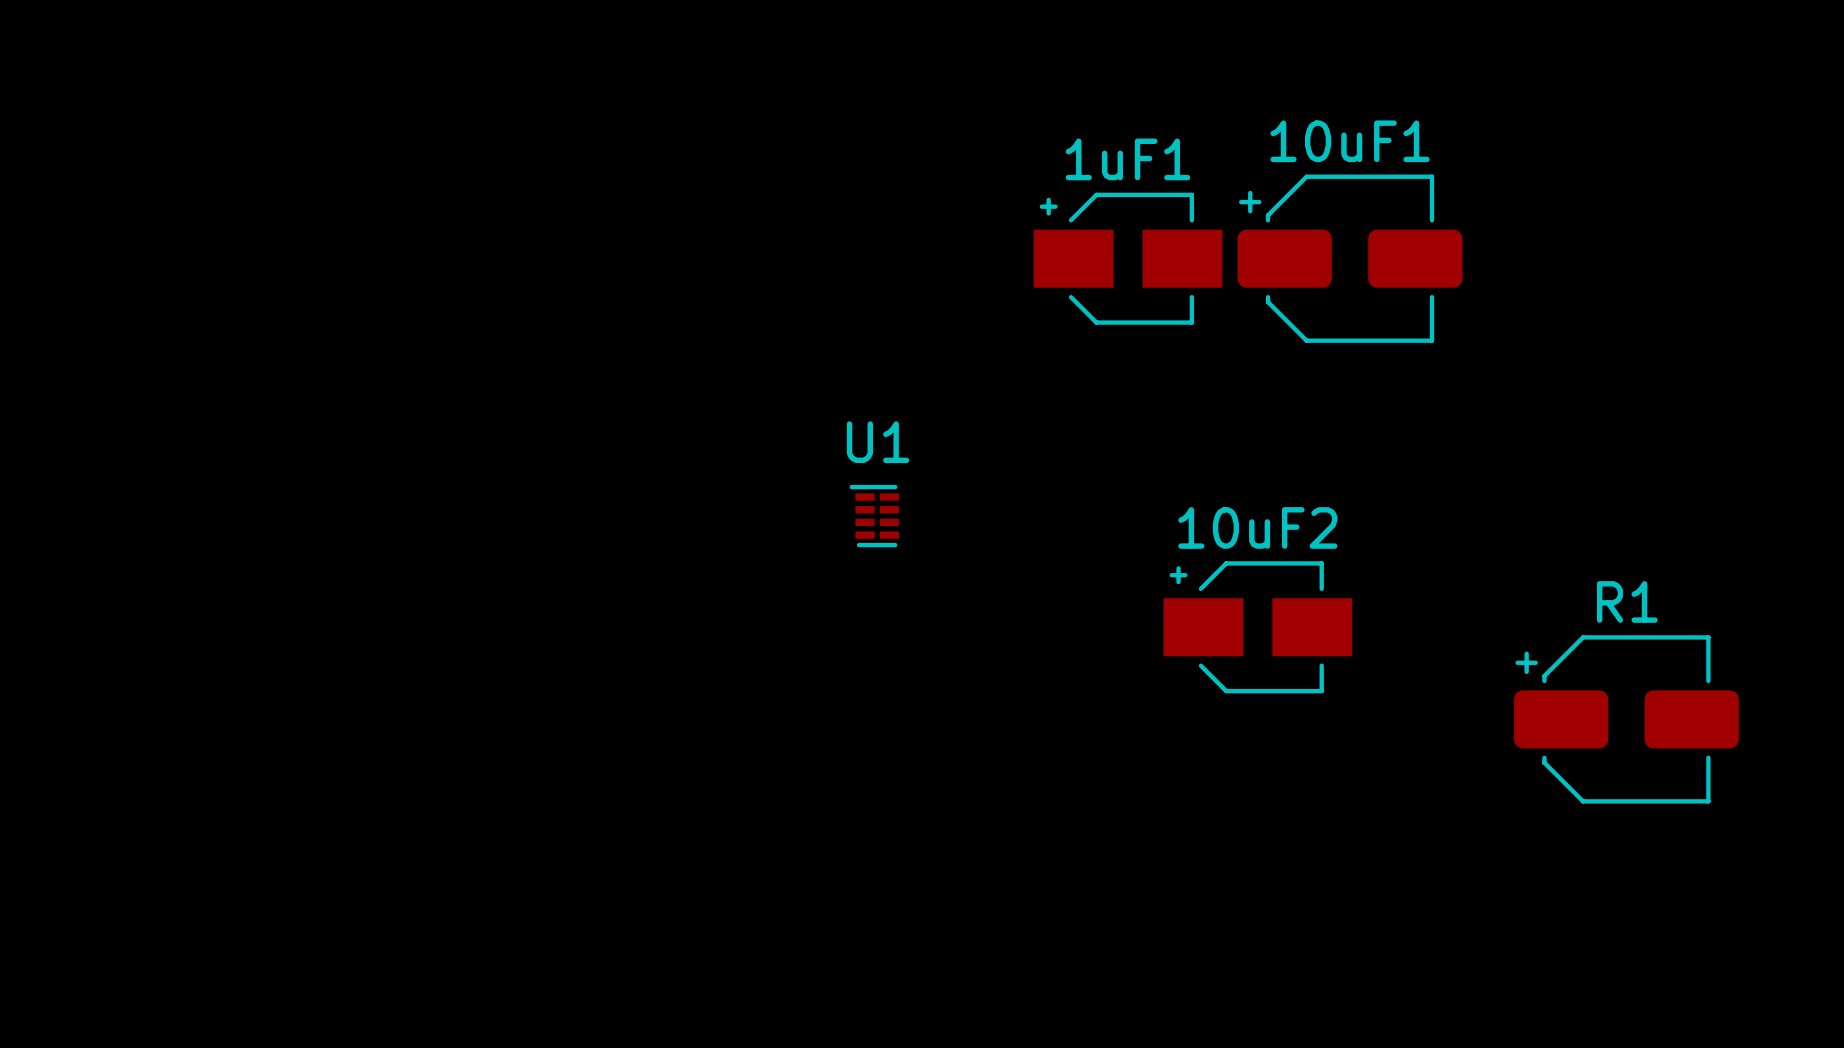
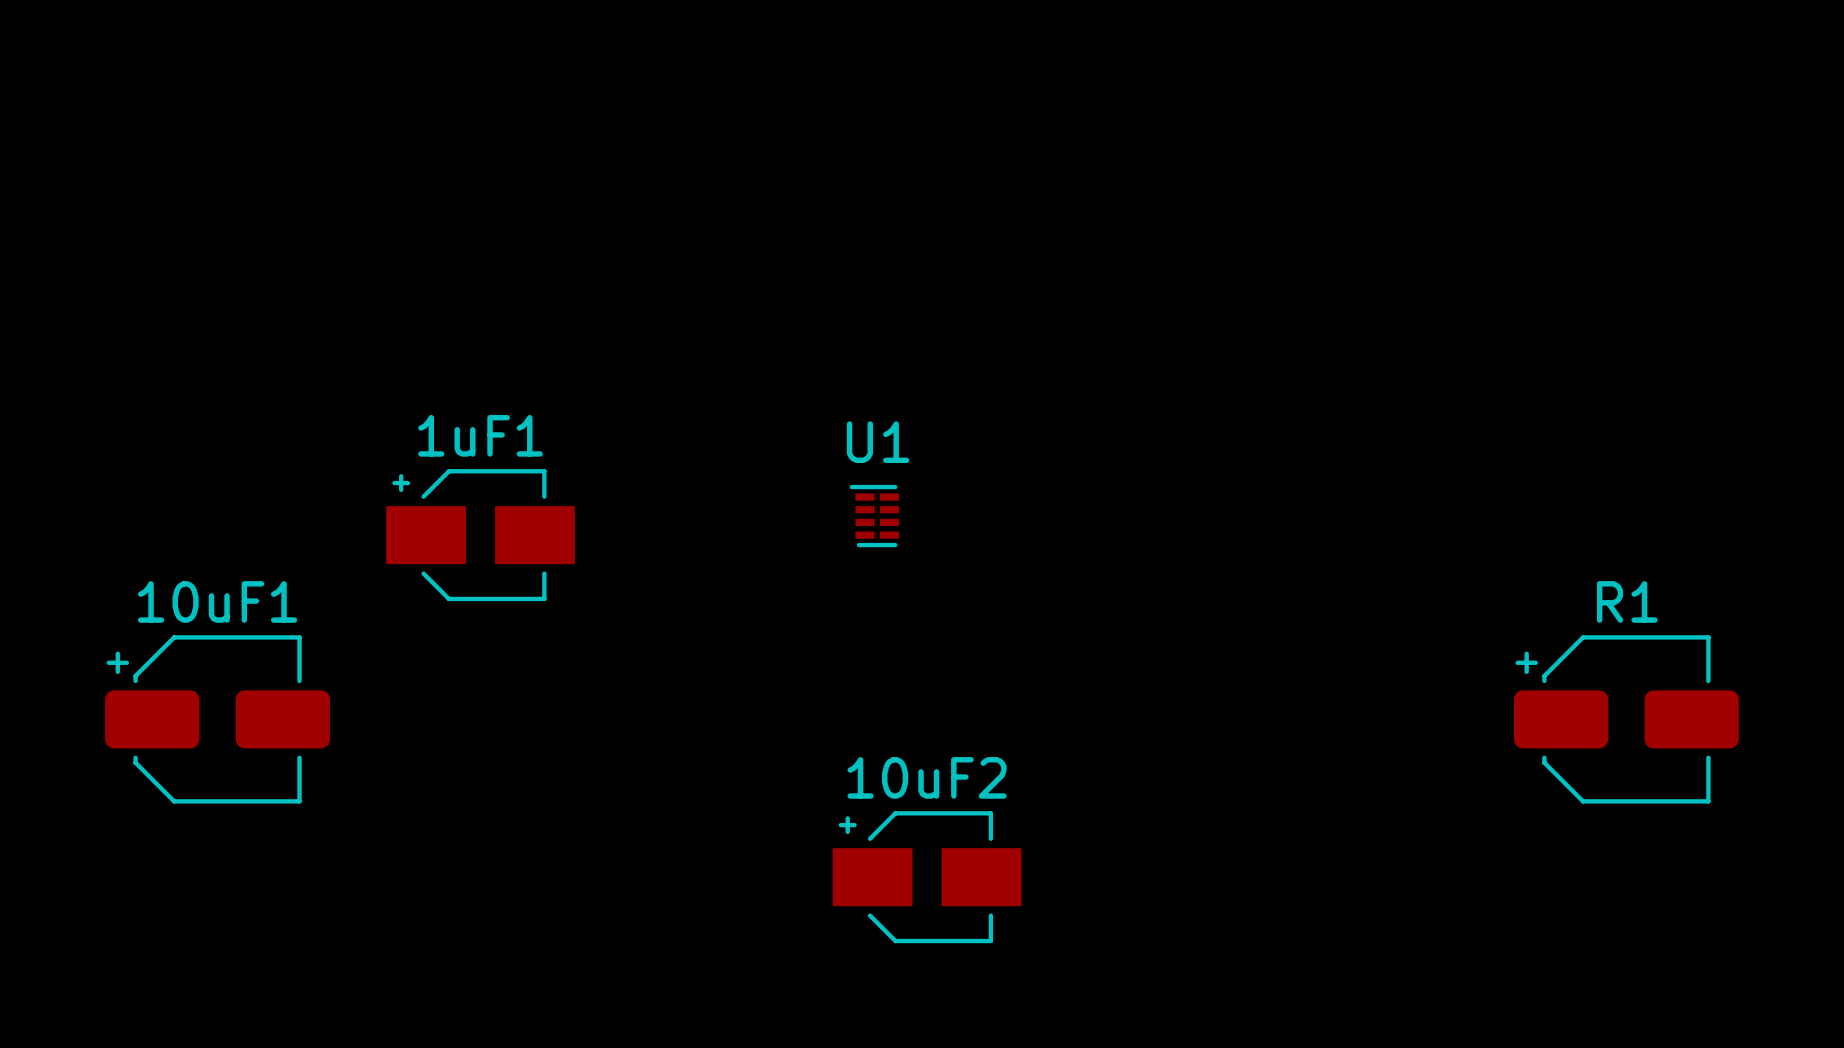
1uF1 position: (1128, 258) -> (480, 535)
10uF1 position: (1350, 258) -> (217, 719)
10uF2 position: (1257, 627) -> (927, 877)

